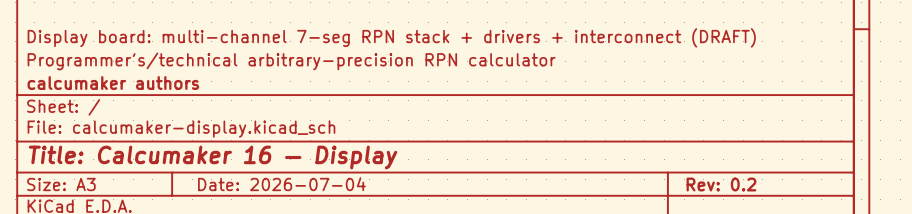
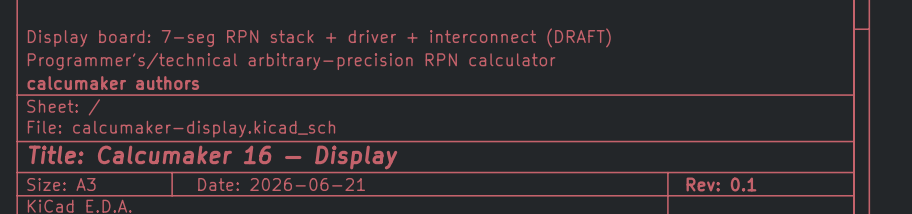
title block: Display board: multi-channel 7-seg RPN stack + drivers + interconnect (DRAFT) (391, 37) -> Display board: 7-seg RPN stack + driver + interconnect (DRAFT) (319, 37)
title block: Date: 2026-07-04 (281, 184) -> Date: 2026-06-21 (281, 184)
title block: Rev: 0.2 (721, 184) -> Rev: 0.1 (721, 184)

